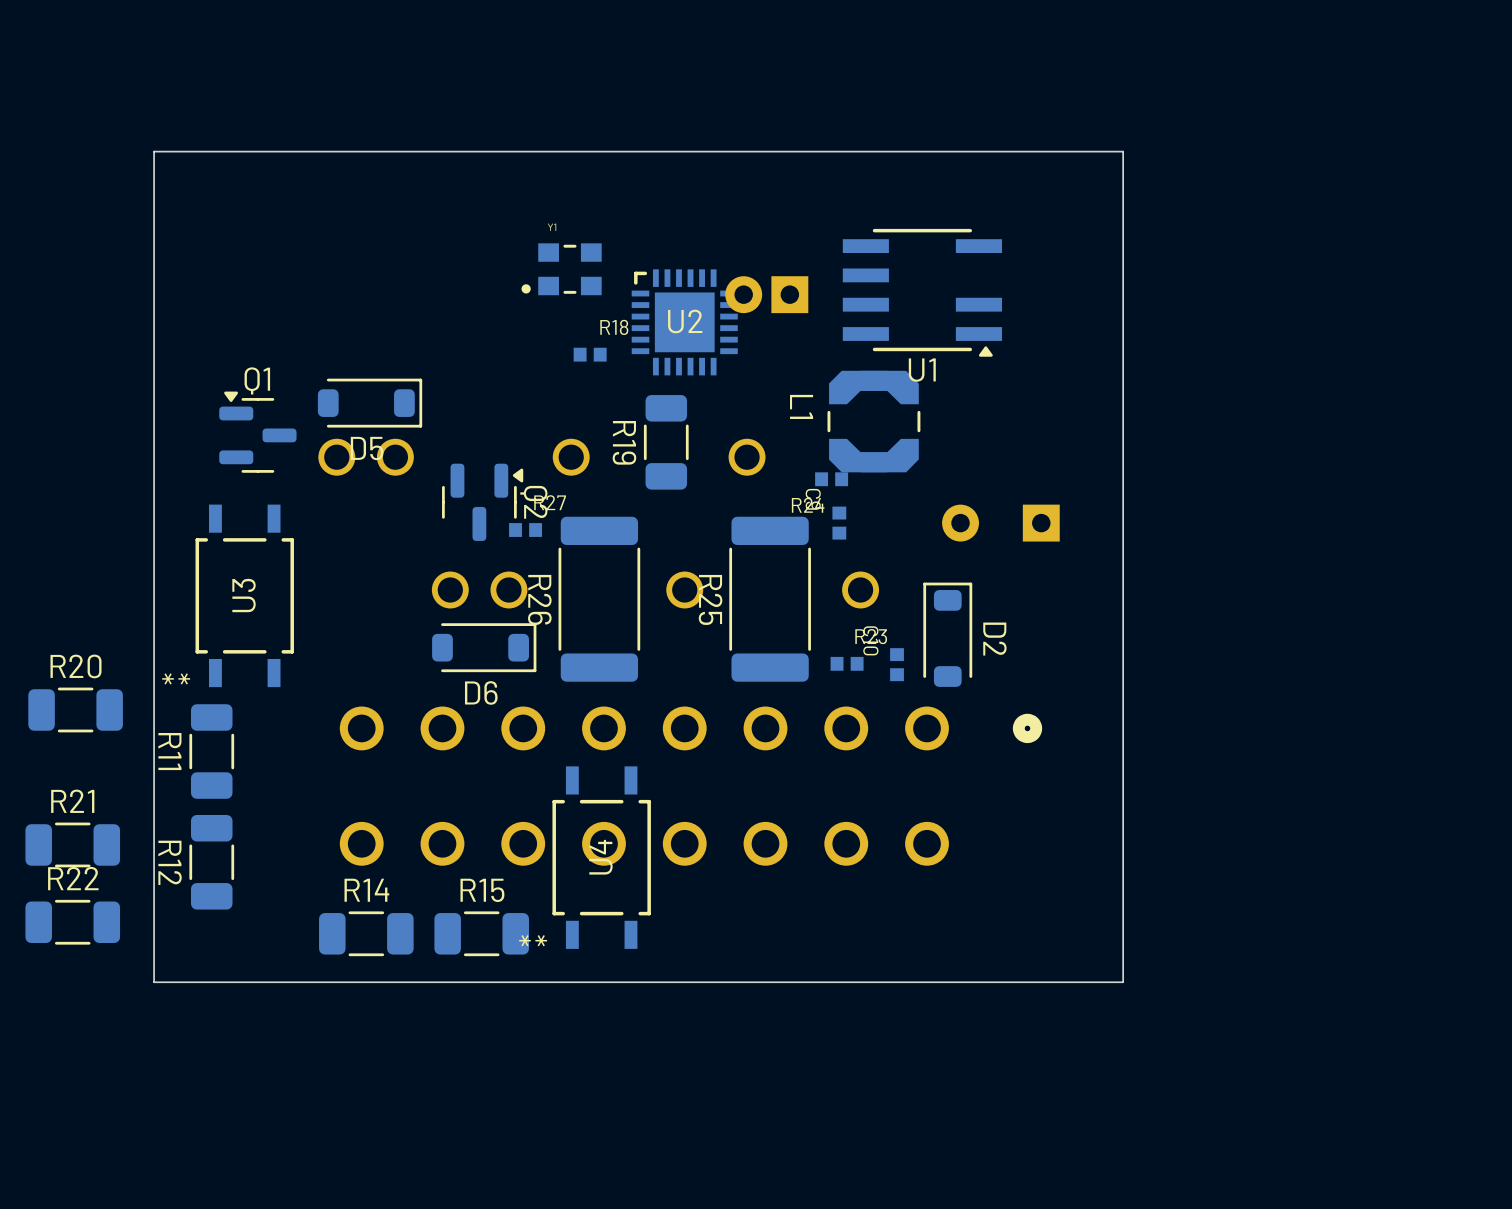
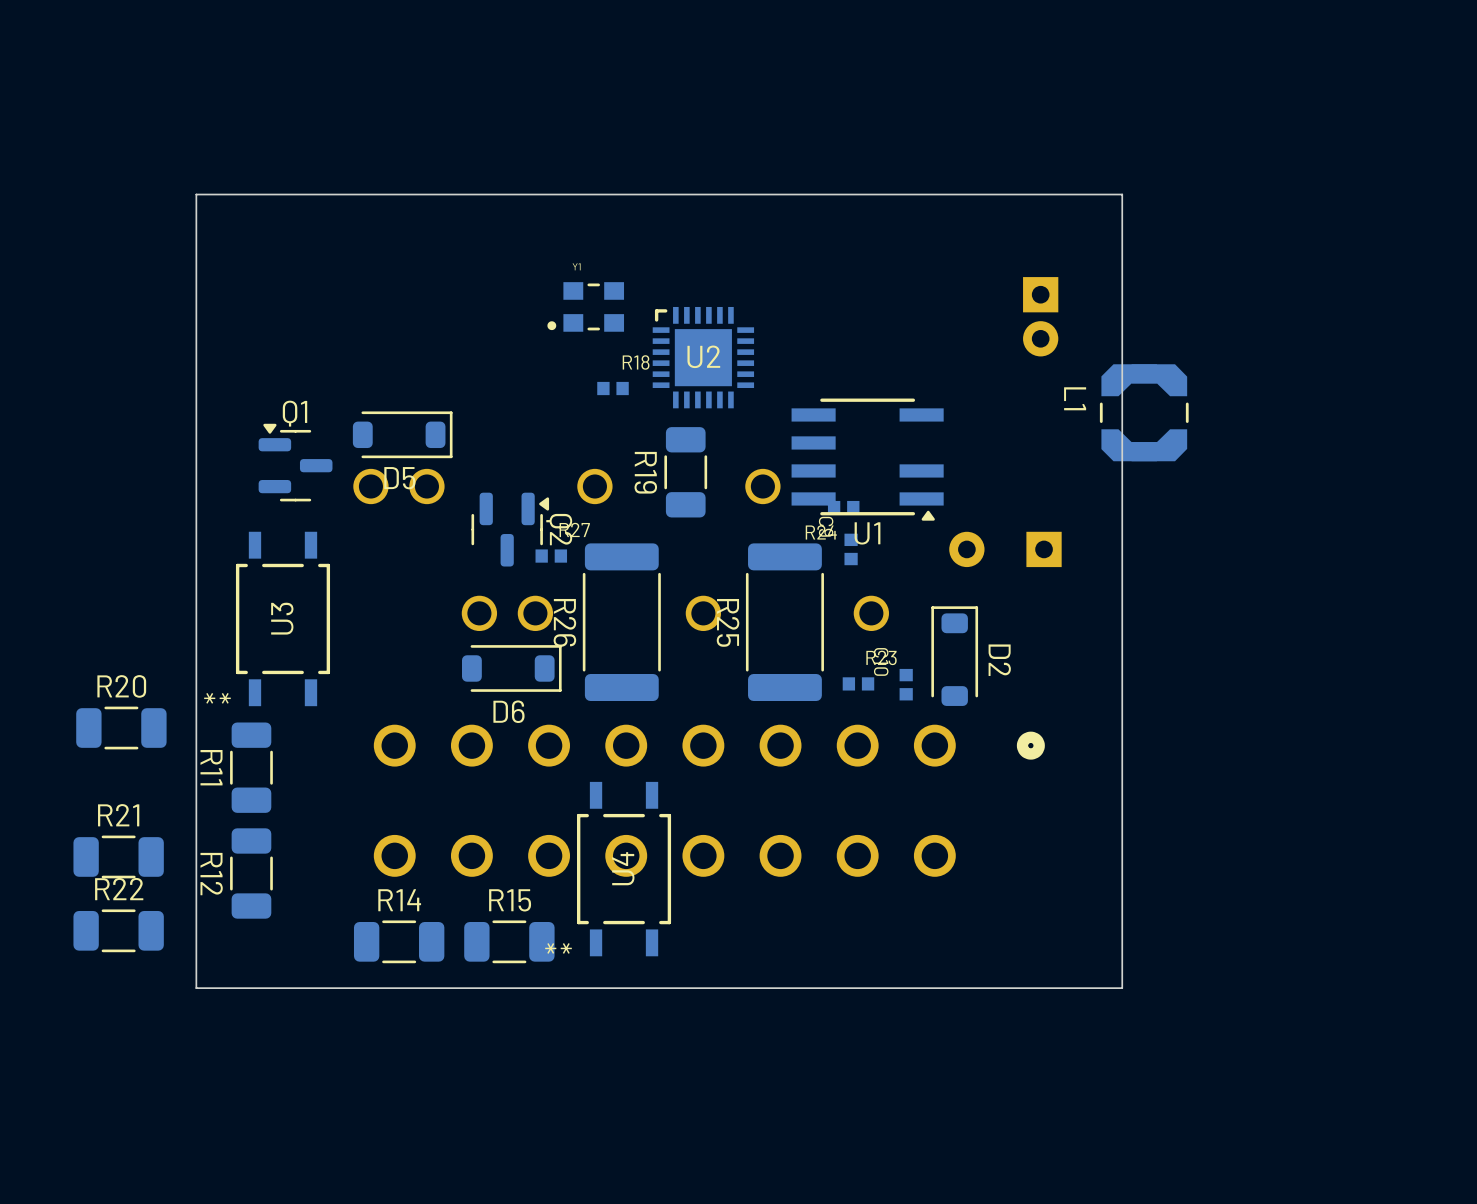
U1 position: (922, 292) -> (867, 459)
part rotation: 0° (766, 294) -> 90° counterclockwise (1040, 316)
part position: (766, 294) -> (1040, 316)
L1 position: (873, 421) -> (1144, 412)

